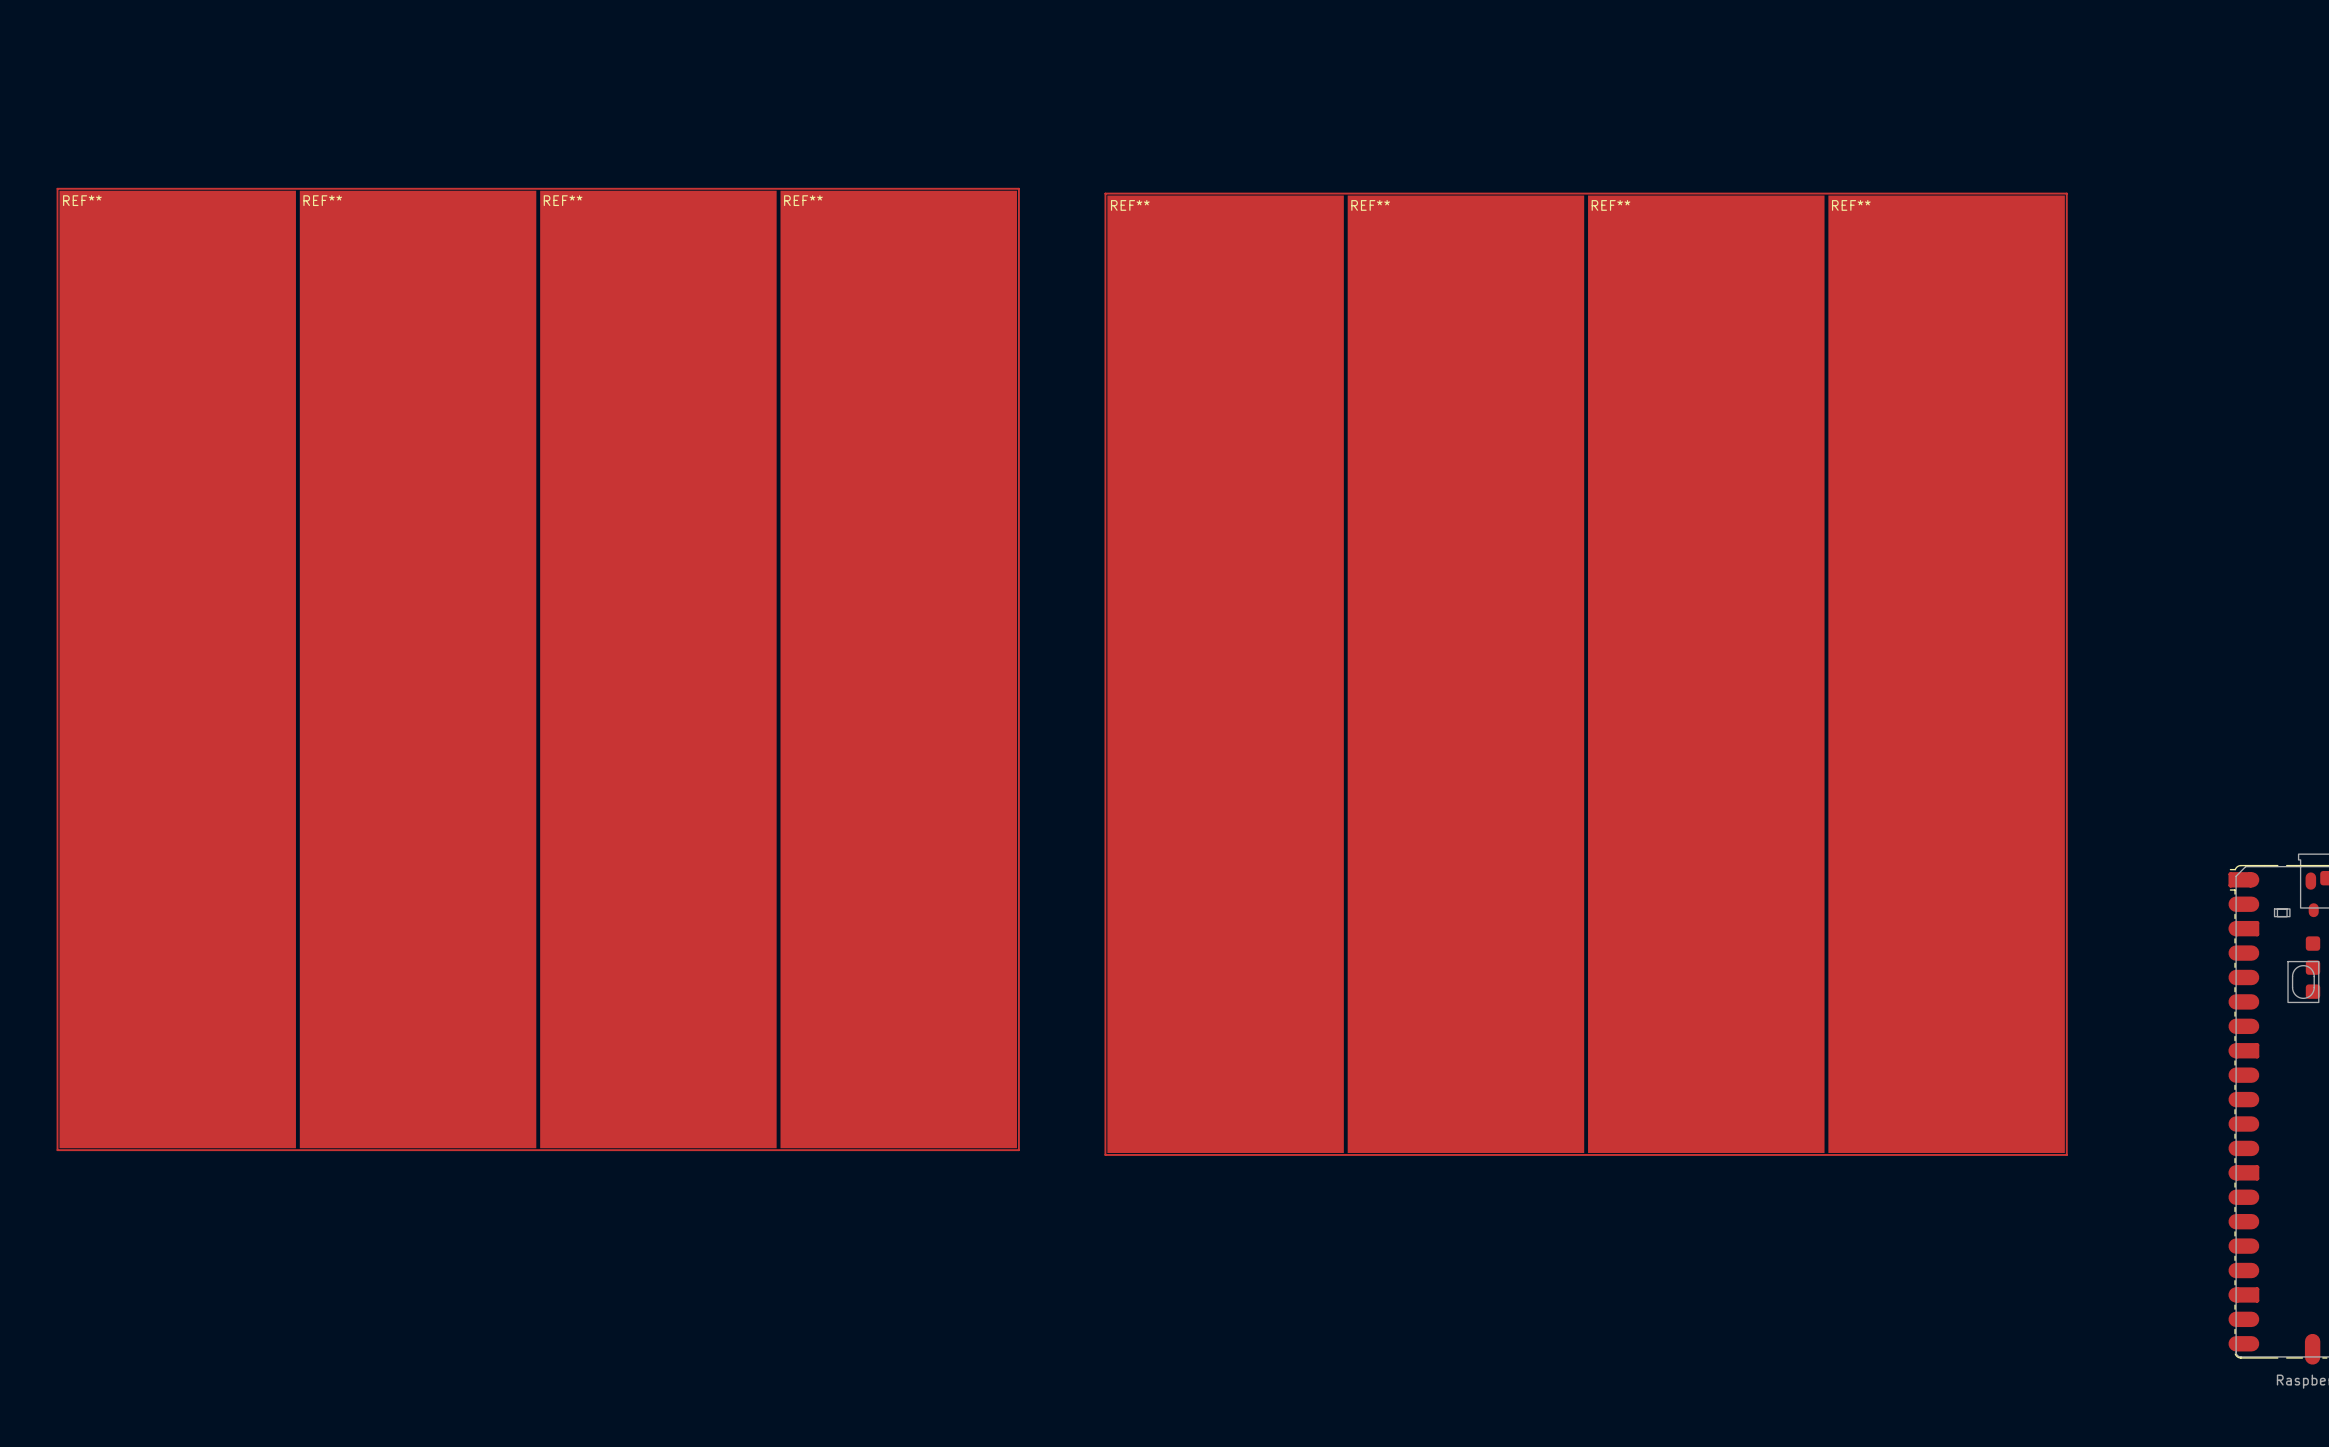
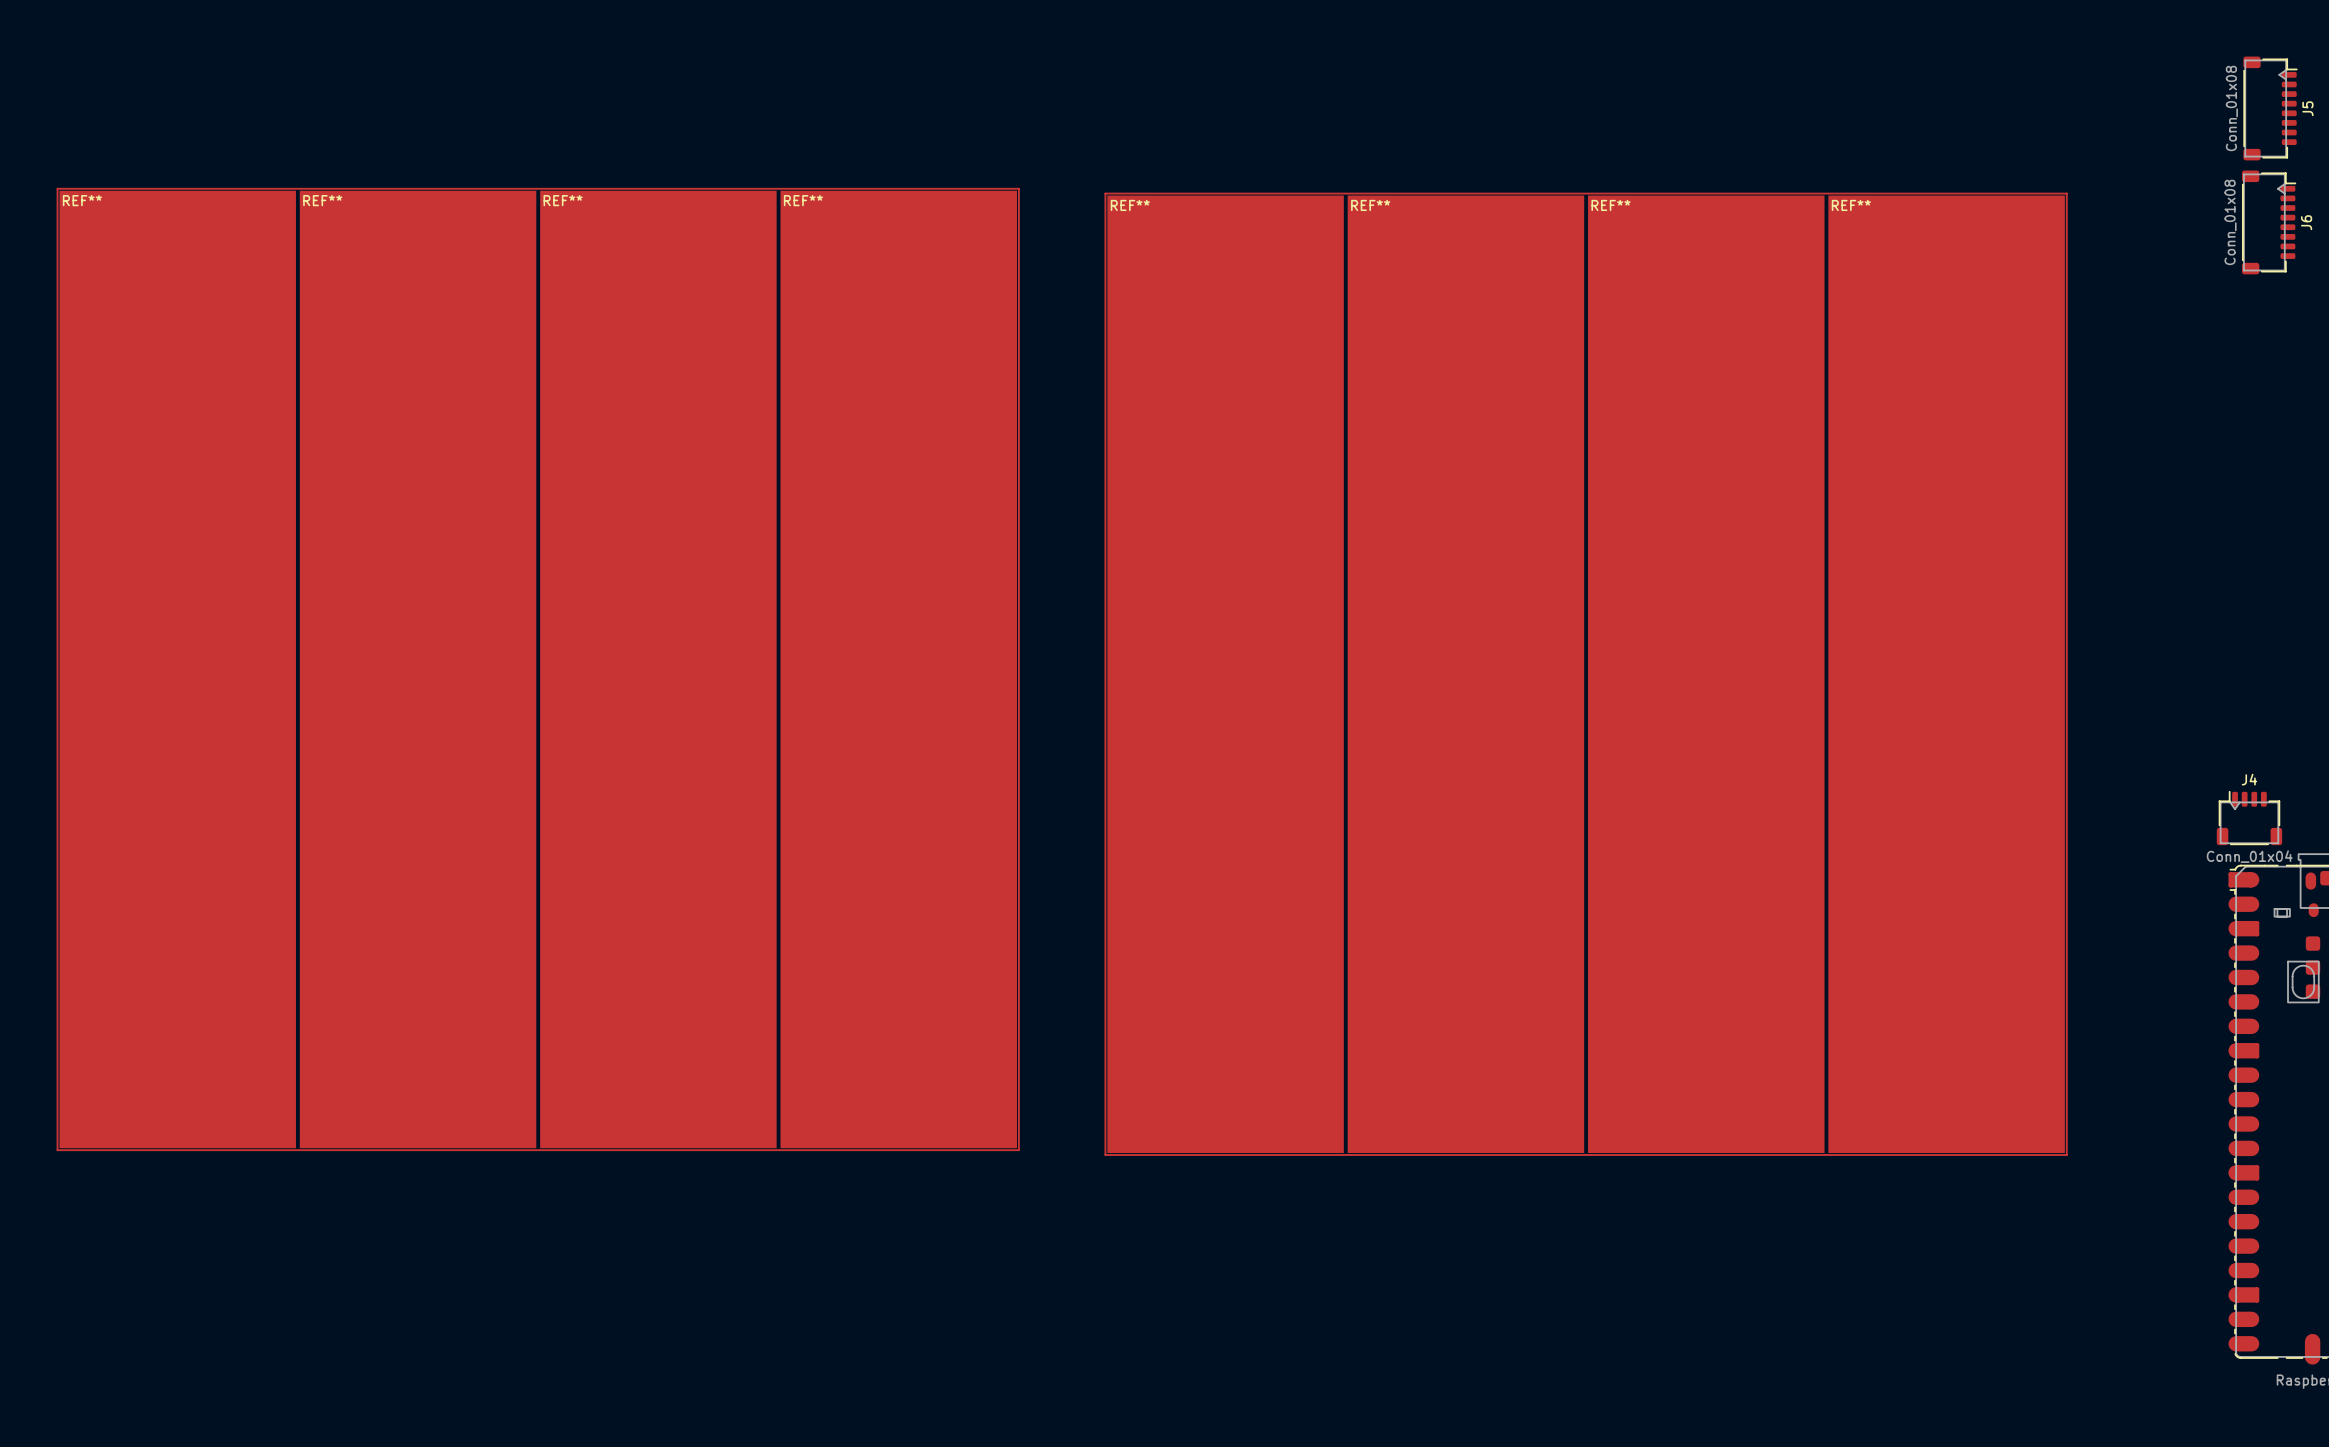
J5: none -> Conn_01x08 (2270, 108)
J6: none -> Conn_01x08 (2268, 222)
J4: none -> Conn_01x04 (2249, 818)

